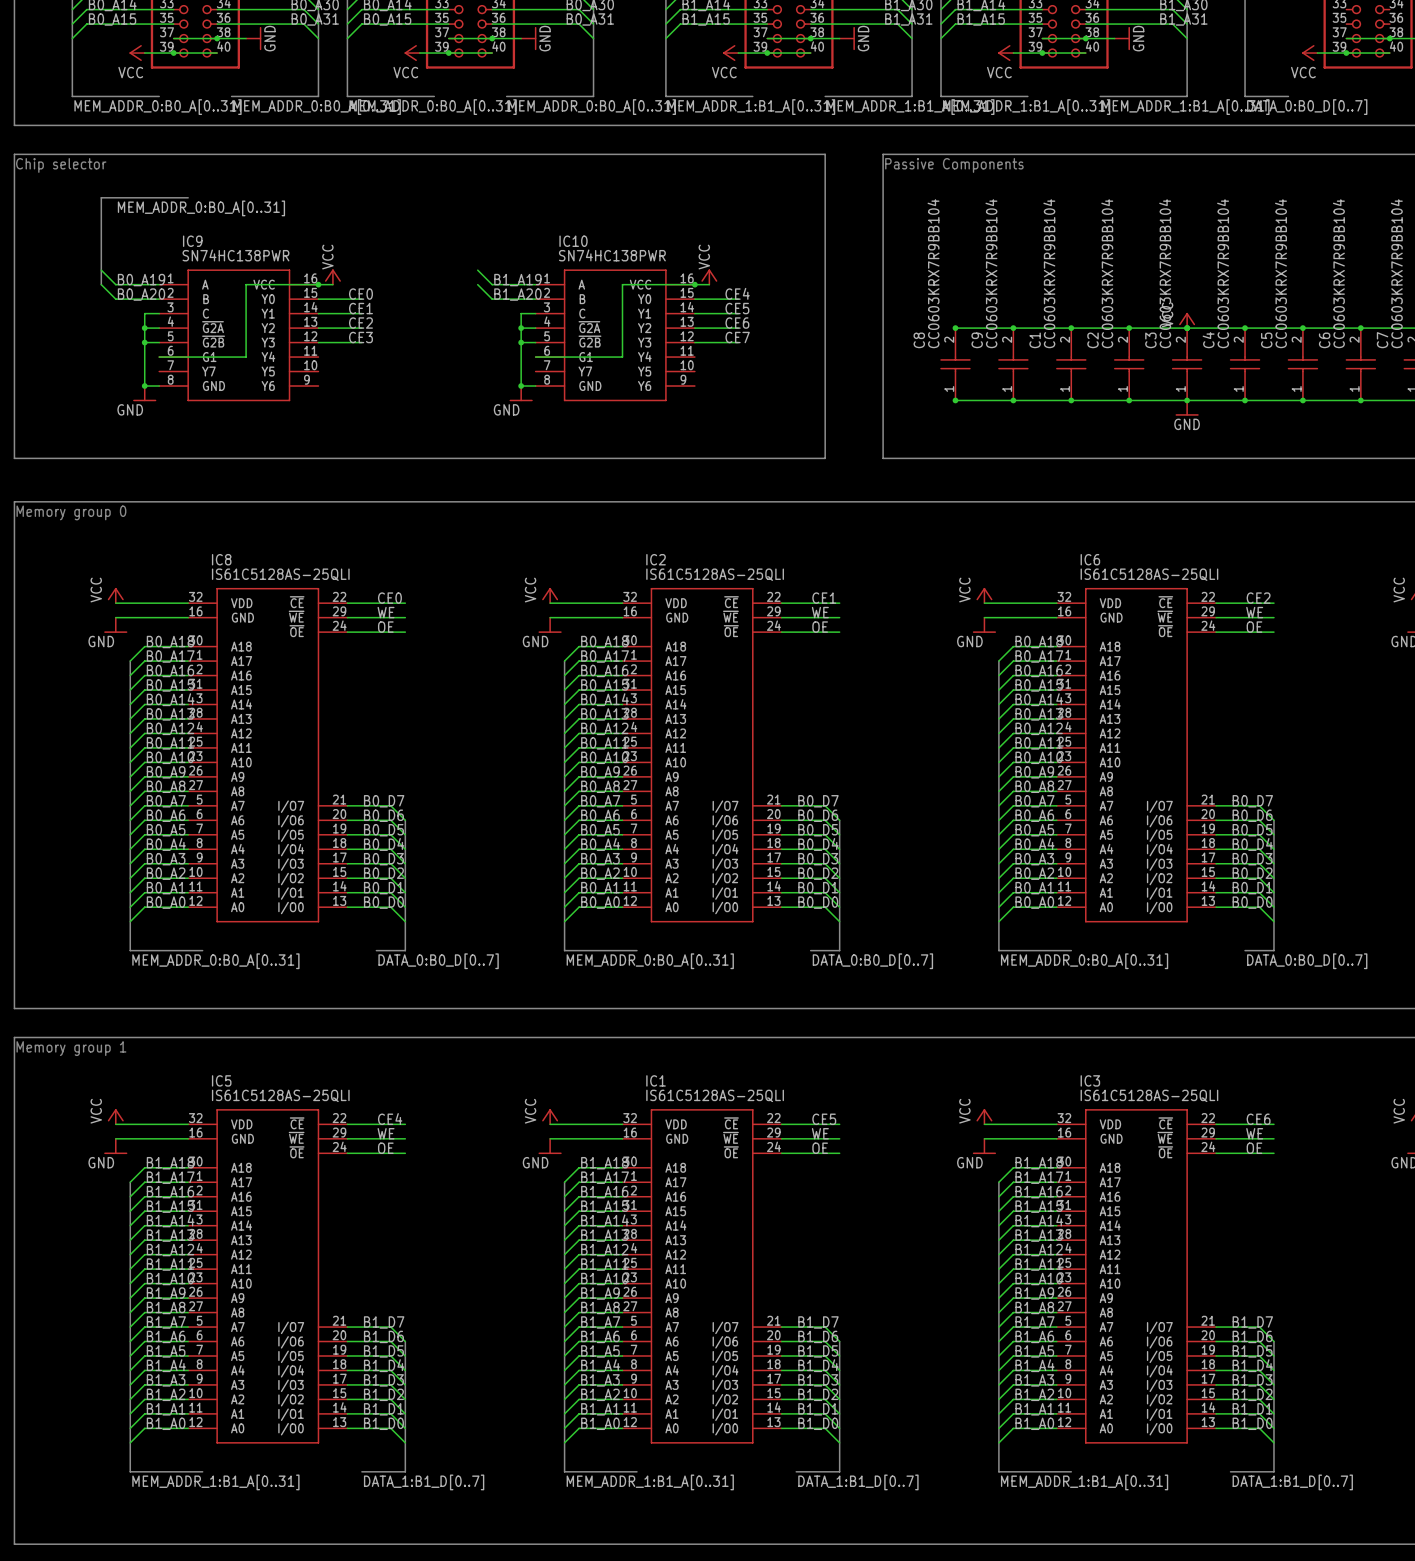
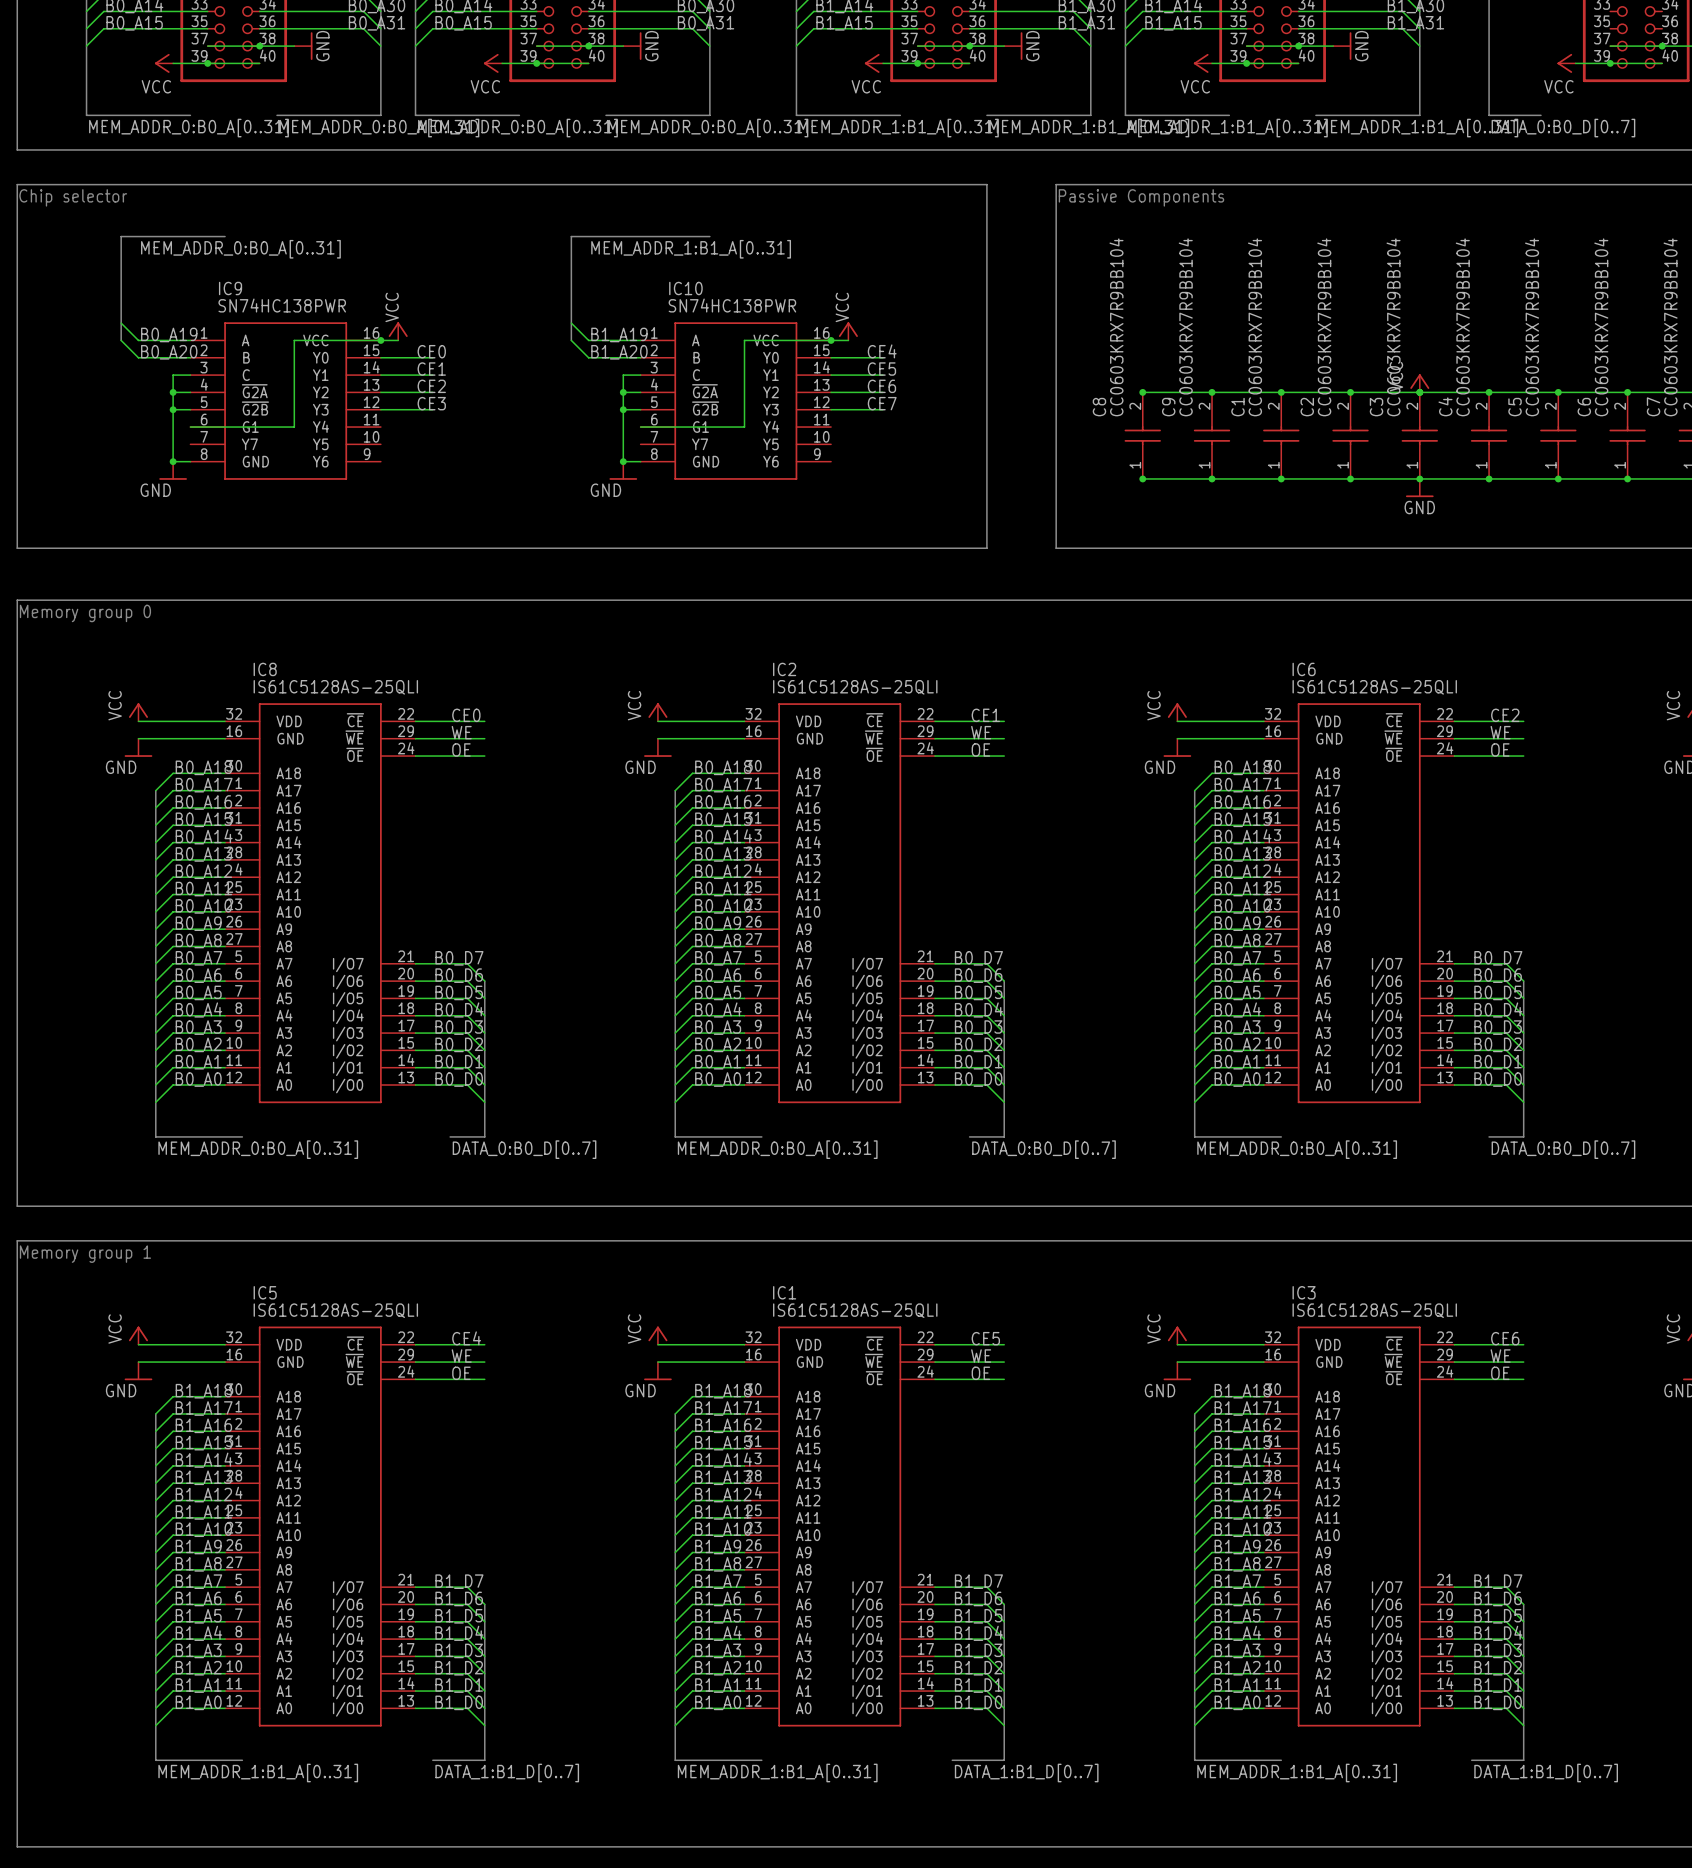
bus: none -> (709, 236) (571, 236) (571, 340)
label: none -> MEM_ADDR_1:B1_A[0..31] (691, 249)

